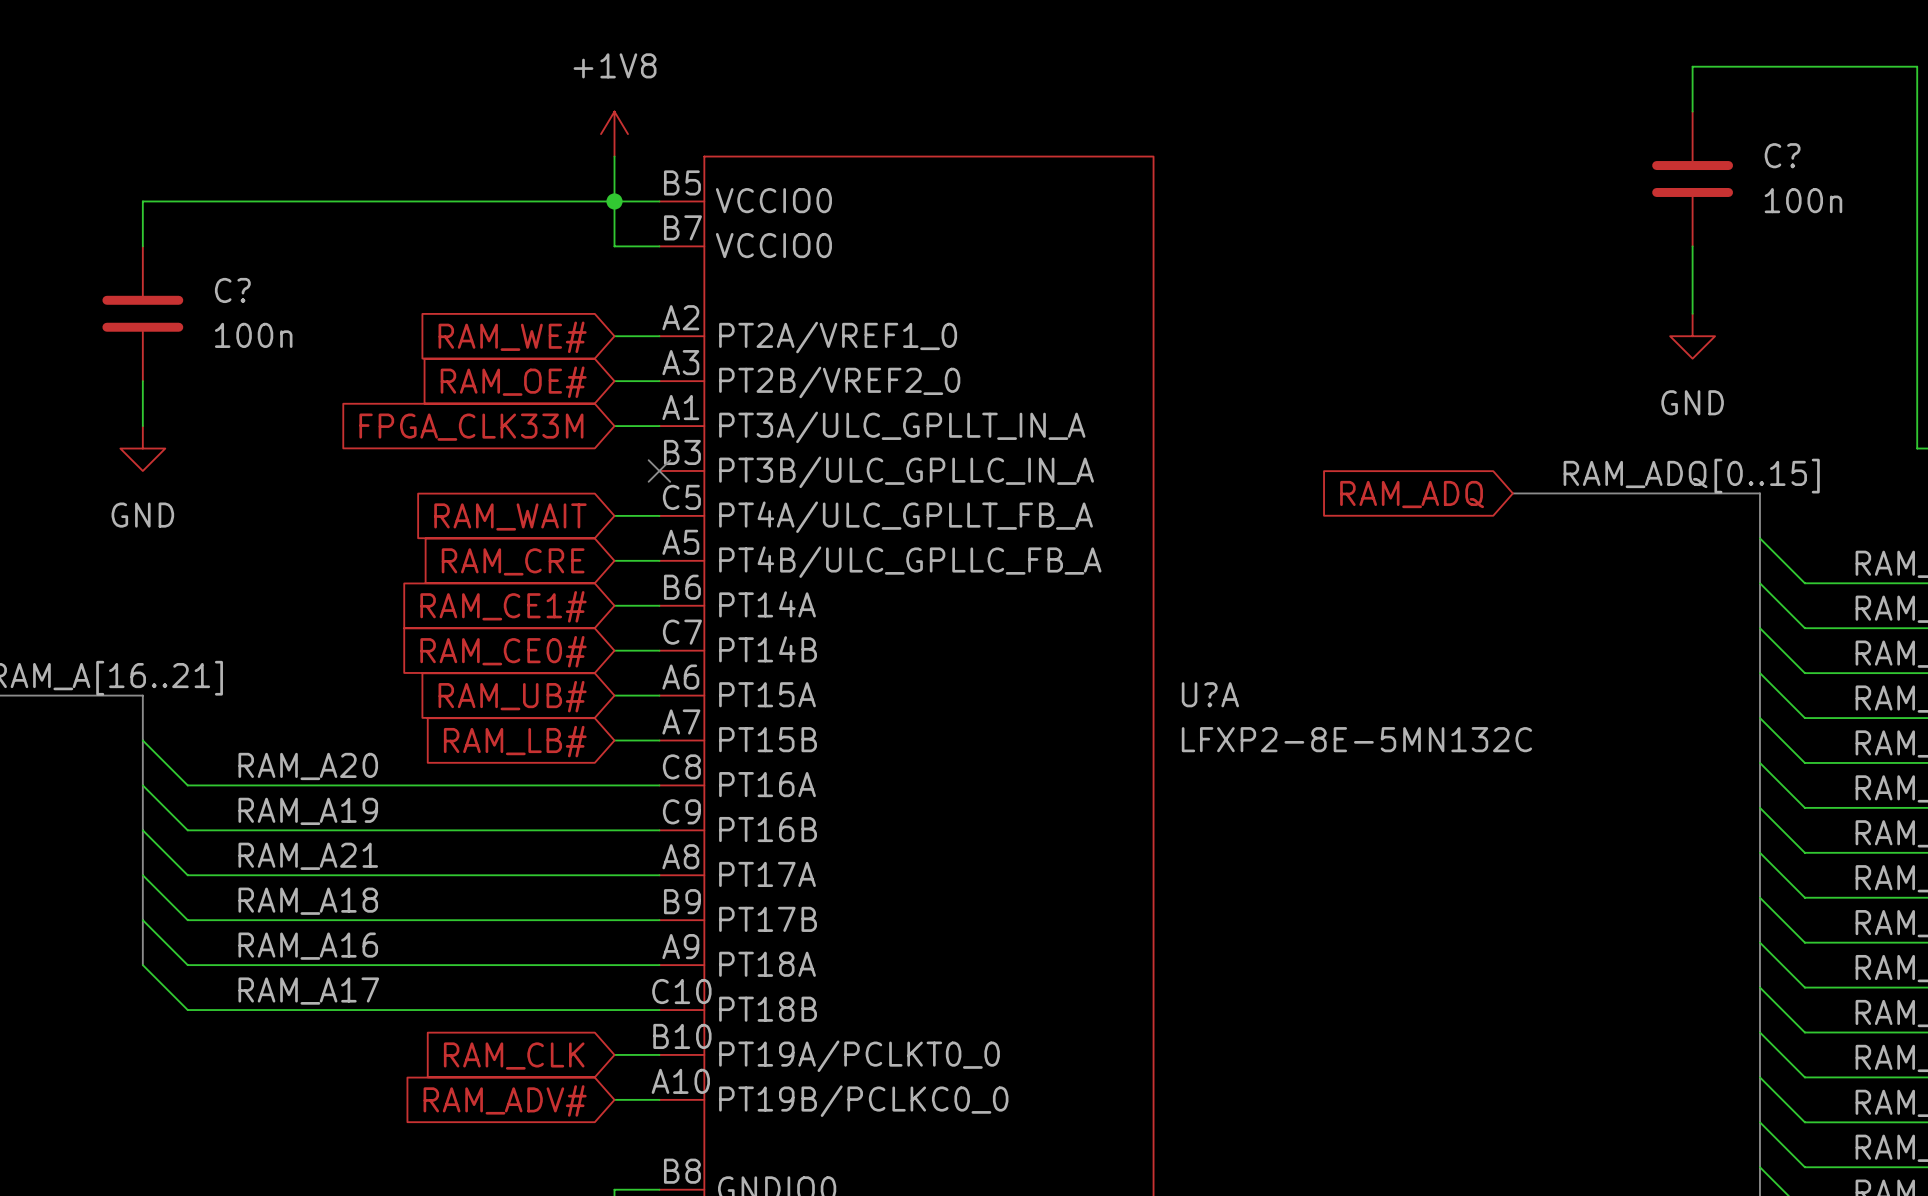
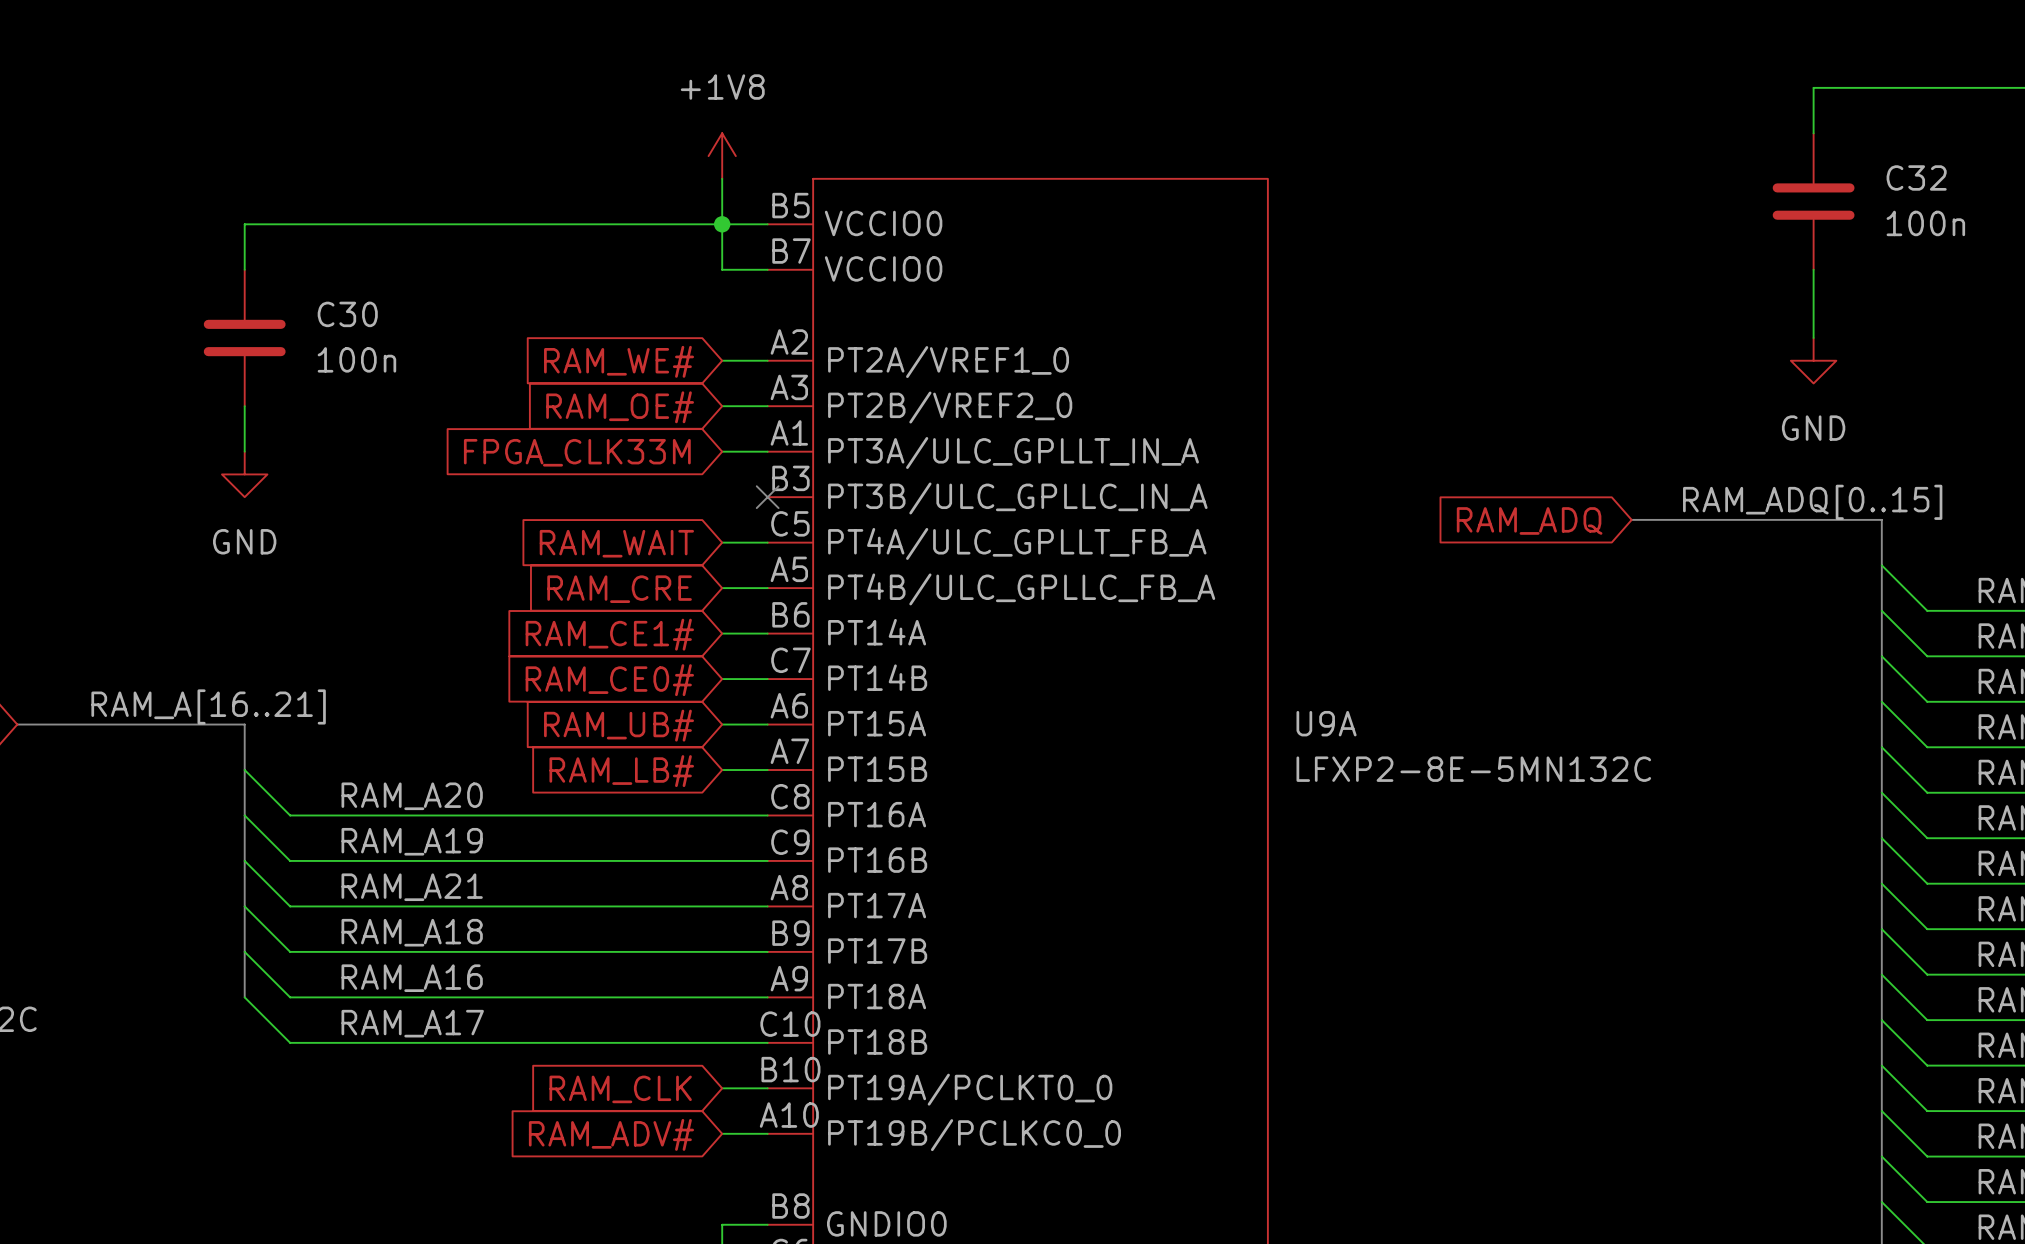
C? name: C? (1782, 155) -> C32 (1916, 177)
C? name: C? (232, 290) -> C30 (347, 314)
U?A name: U?A (1210, 694) -> U9A (1326, 723)

